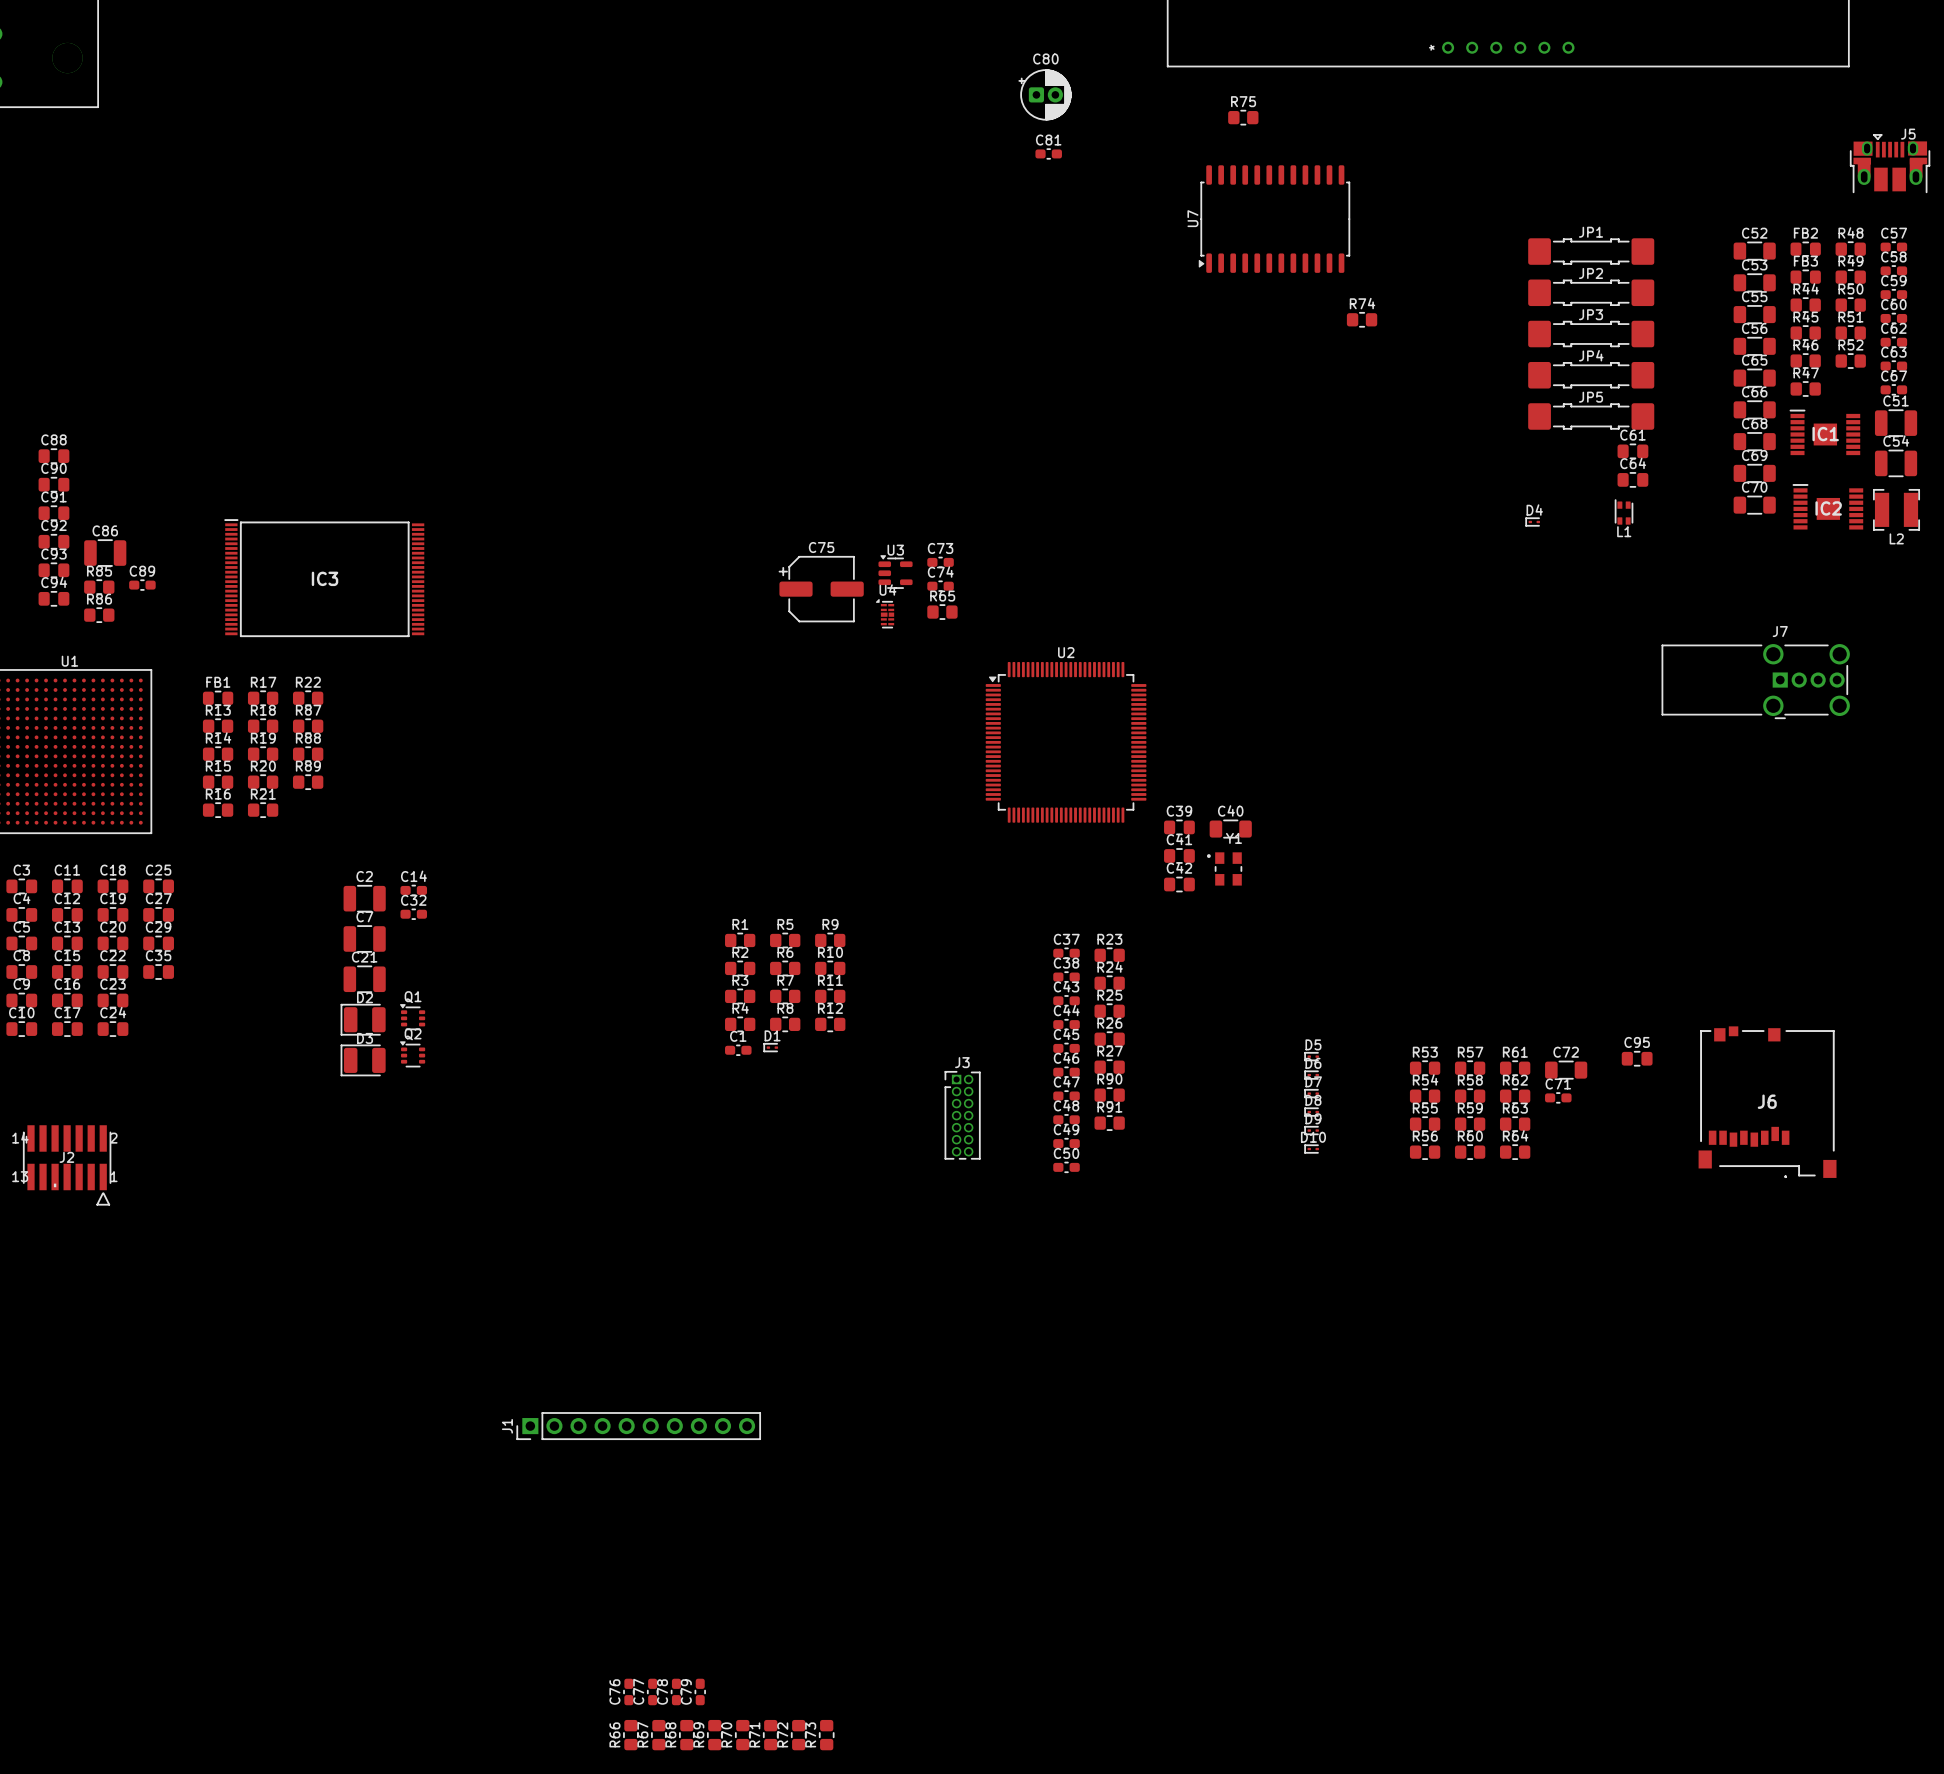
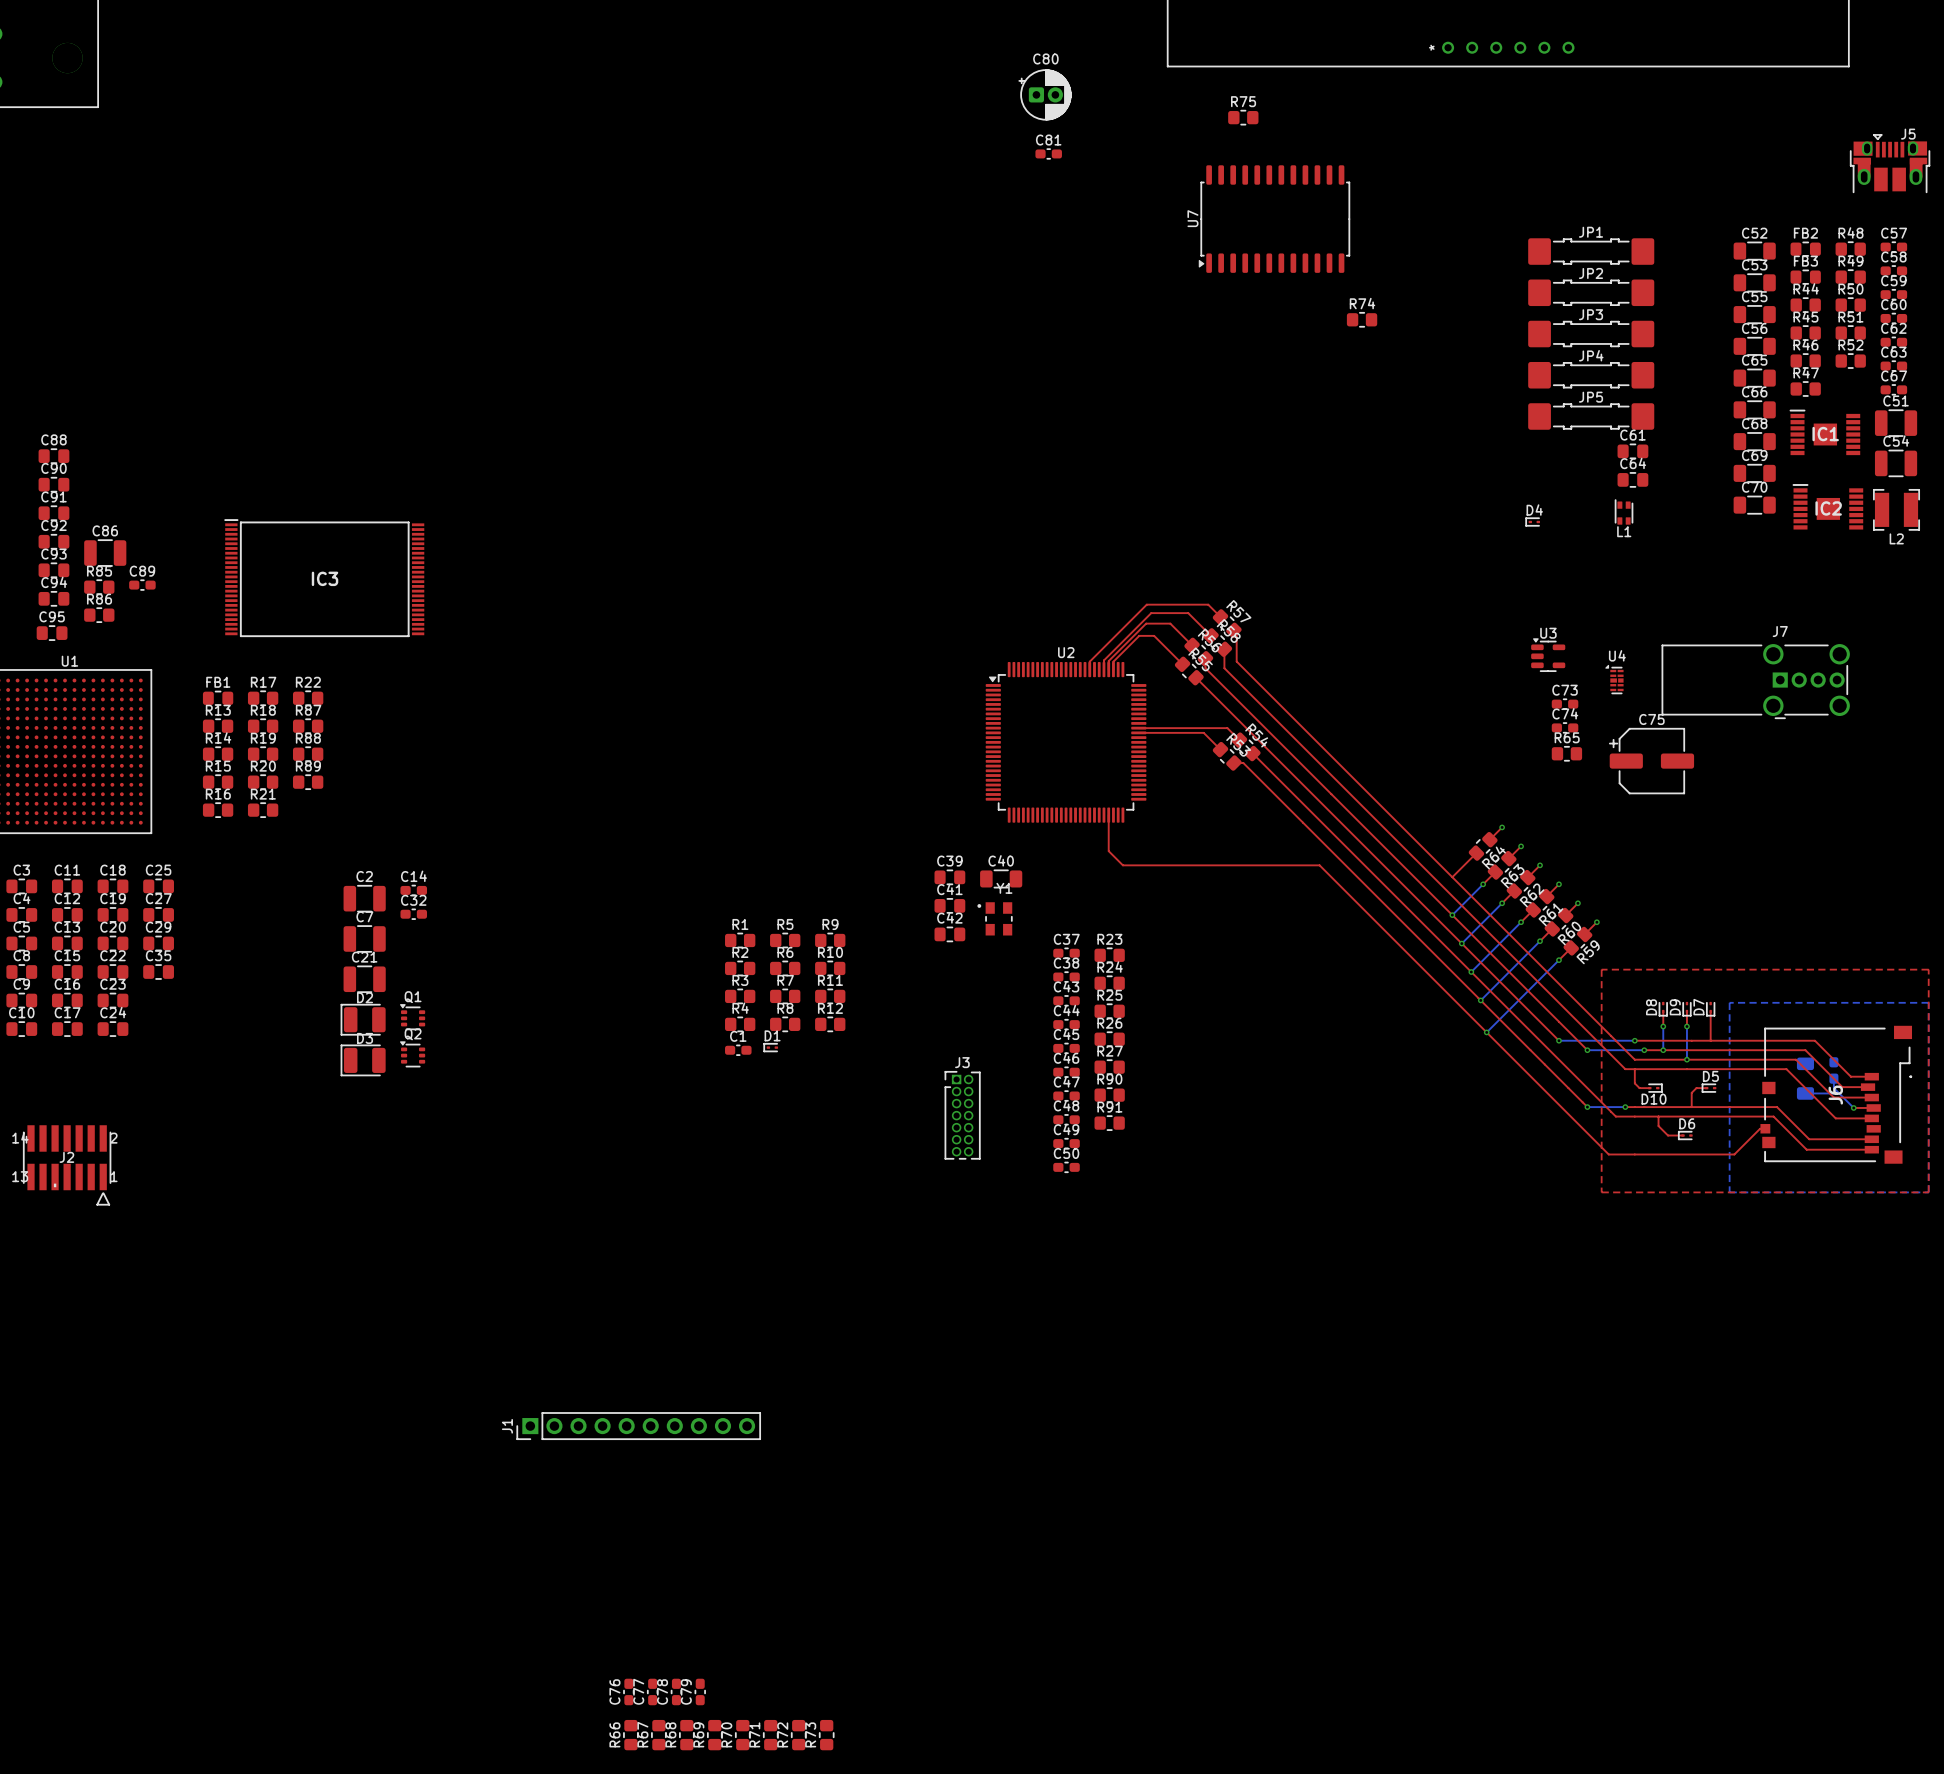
C75 footprint: [778, 556, 864, 623] -> [1609, 728, 1695, 794]
C73 position: (940, 562) -> (1565, 704)
U3 position: (895, 571) -> (1548, 655)
C74 position: (940, 586) -> (1565, 727)
R65 position: (942, 612) -> (1566, 753)
U4 position: (885, 613) -> (1614, 679)
top track: none -> (1220, 616) (1208, 604) (1146, 604) (1089, 661) (1089, 669)
top track: none -> (1233, 630) (1236, 633) (1236, 661) (1634, 1059) (1795, 1059) (1833, 1097) (1871, 1097)
top track: none -> (1211, 635) (1188, 613) (1151, 613) (1103, 660) (1103, 669)
top track: none -> (1192, 645) (1170, 623) (1146, 623) (1108, 661) (1108, 669)
top track: none -> (1224, 649) (1224, 668) (1625, 1069) (1786, 1069) (1835, 1118) (1871, 1118)
top track: none -> (1205, 658) (1205, 668) (1587, 1050)
top track: none -> (1182, 664) (1154, 635) (1139, 635) (1113, 661) (1113, 669)
top track: none -> (1195, 677) (1558, 1040)
top track: none -> (1138, 728) (1227, 728) (1239, 740)
top track: none -> (1138, 732) (1203, 732) (1220, 749)
top track: none -> (1252, 753) (1615, 1116) (1773, 1116) (1806, 1149) (1878, 1149)
top track: none -> (1233, 763) (1243, 763) (1587, 1107)
top track: none -> (1108, 815) (1108, 851) (1122, 865) (1319, 865) (1608, 1154) (1734, 1154) (1760, 1128) (1765, 1128)
C39 position: (1179, 827) -> (949, 877)
top track: none -> (1502, 827) (1489, 839)
via: none -> (1502, 827)
C40 position: (1230, 829) -> (1001, 878)
top track: none -> (1521, 846) (1508, 858)
via: none -> (1521, 846)
top track: none -> (1476, 853) (1452, 877)
C41 position: (1179, 855) -> (949, 905)
top track: none -> (1540, 865) (1527, 877)
via: none -> (1540, 865)
Y1 position: (1224, 868) -> (994, 918)
top track: none -> (1495, 872) (1483, 884)
C42 position: (1179, 884) -> (949, 934)
bottom track: none -> (1483, 884) (1452, 915)
via: none -> (1483, 884)
top track: none -> (1558, 884) (1546, 896)
via: none -> (1558, 884)
top track: none -> (1514, 891) (1502, 903)
bottom track: none -> (1502, 903) (1461, 943)
via: none -> (1502, 903)
top track: none -> (1577, 903) (1565, 915)
via: none -> (1577, 903)
top track: none -> (1533, 909) (1521, 922)
via: none -> (1452, 915)
bottom track: none -> (1521, 922) (1471, 972)
via: none -> (1521, 922)
top track: none -> (1596, 922) (1584, 934)
via: none -> (1596, 922)
top track: none -> (1552, 928) (1540, 941)
bottom track: none -> (1540, 941) (1480, 1000)
via: none -> (1540, 941)
via: none -> (1461, 943)
top track: none -> (1571, 947) (1558, 960)
bottom track: none -> (1558, 960) (1486, 1032)
via: none -> (1558, 960)
top zone outline: none -> (1601, 969) (1601, 1192) (1928, 1192) (1928, 969) (1601, 969)
via: none -> (1471, 972)
via: none -> (1480, 1000)
bottom zone outline: none -> (1729, 1002) (1729, 1192) (1928, 1192) (1928, 1002) (1729, 1002)
top track: none -> (1663, 1011) (1663, 1026)
top track: none -> (1686, 1011) (1686, 1026)
top track: none -> (1710, 1011) (1710, 1040)
bottom track: none -> (1663, 1026) (1663, 1050)
via: none -> (1663, 1026)
bottom track: none -> (1686, 1026) (1686, 1059)
via: none -> (1686, 1026)
via: none -> (1486, 1032)
bottom track: none -> (1558, 1040) (1634, 1040)
via: none -> (1558, 1040)
top track: none -> (1634, 1040) (1814, 1040) (1850, 1076) (1871, 1076)
via: none -> (1634, 1040)
bottom track: none -> (1587, 1050) (1644, 1050)
via: none -> (1587, 1050)
top track: none -> (1644, 1050) (1805, 1050) (1842, 1087) (1868, 1087)
via: none -> (1644, 1050)
via: none -> (1663, 1050)
R61 name position: R61 (1515, 1052) -> R61 (1551, 914)
D5 position: (1311, 1056) -> (1709, 1088)
C95 position: (1637, 1058) -> (52, 633)
via: none -> (1686, 1059)
R53 rotation: 0° (1425, 1068) -> 45° clockwise (1227, 756)
R53 position: (1425, 1068) -> (1227, 756)
R57 rotation: 0° (1470, 1068) -> 45° clockwise (1227, 623)
R57 position: (1470, 1068) -> (1227, 623)
R61 rotation: 0° (1515, 1068) -> 45° counterclockwise (1540, 903)
R61 position: (1515, 1068) -> (1540, 903)
top track: none -> (1634, 1069) (1634, 1083) (1639, 1088) (1649, 1088)
C72: (1566, 1070) -> none
part: none -> (1833, 1070)
D6 position: (1311, 1075) -> (1685, 1135)
part: none -> (1805, 1078)
bottom track: none -> (1833, 1078) (1833, 1088) (1853, 1107)
R62 name position: R62 (1515, 1080) -> R62 (1532, 895)
top track: none -> (1706, 1088) (1696, 1088) (1691, 1092) (1691, 1107)
bottom track: none -> (1838, 1092) (1805, 1093)
D7 rotation: 0° (1311, 1093) -> 90° counterclockwise (1710, 1009)
D7 position: (1311, 1093) -> (1710, 1009)
R54 rotation: 0° (1425, 1096) -> 45° clockwise (1246, 746)
R54 position: (1425, 1096) -> (1246, 746)
R58 rotation: 0° (1470, 1096) -> 45° clockwise (1217, 642)
R58 position: (1470, 1096) -> (1217, 642)
R62 rotation: 0° (1515, 1096) -> 45° counterclockwise (1521, 884)
R62 position: (1515, 1096) -> (1521, 884)
C71: (1558, 1097) -> none
J6 rotation: 0° (1767, 1102) -> 90° counterclockwise (1836, 1094)
bottom track: none -> (1587, 1107) (1625, 1107)
via: none -> (1587, 1107)
top track: none -> (1625, 1107) (1777, 1107) (1809, 1139) (1871, 1139)
via: none -> (1625, 1107)
top track: none -> (1853, 1107) (1873, 1107)
via: none -> (1853, 1107)
R59 name position: R59 (1470, 1108) -> R59 (1588, 952)
R63 name position: R63 (1515, 1108) -> R63 (1512, 876)
D8 rotation: 0° (1311, 1112) -> 90° counterclockwise (1663, 1009)
D8 position: (1311, 1112) -> (1663, 1009)
top track: none -> (1658, 1116) (1658, 1126) (1668, 1135) (1682, 1135)
R55 rotation: 0° (1425, 1124) -> 45° clockwise (1189, 671)
R55 position: (1425, 1124) -> (1189, 671)
R59 rotation: 0° (1470, 1124) -> 45° counterclockwise (1577, 941)
R59 position: (1470, 1124) -> (1577, 941)
R63 rotation: 0° (1515, 1124) -> 45° counterclockwise (1502, 865)
R63 position: (1515, 1124) -> (1502, 865)
D9 rotation: 0° (1311, 1130) -> 90° counterclockwise (1686, 1009)
D9 position: (1311, 1130) -> (1686, 1009)
R64 name position: R64 (1515, 1135) -> R64 (1493, 858)
R60 name position: R60 (1470, 1136) -> R60 (1569, 933)
D10 rotation: 0° (1311, 1149) -> 180° (1655, 1088)
D10 position: (1311, 1149) -> (1655, 1088)
R56 rotation: 0° (1425, 1152) -> 45° clockwise (1198, 652)
R56 position: (1425, 1152) -> (1198, 652)
R60 rotation: 0° (1470, 1152) -> 45° counterclockwise (1558, 922)
R60 position: (1470, 1152) -> (1558, 922)
R64 rotation: 0° (1515, 1152) -> 45° counterclockwise (1483, 846)
R64 position: (1515, 1152) -> (1483, 846)

